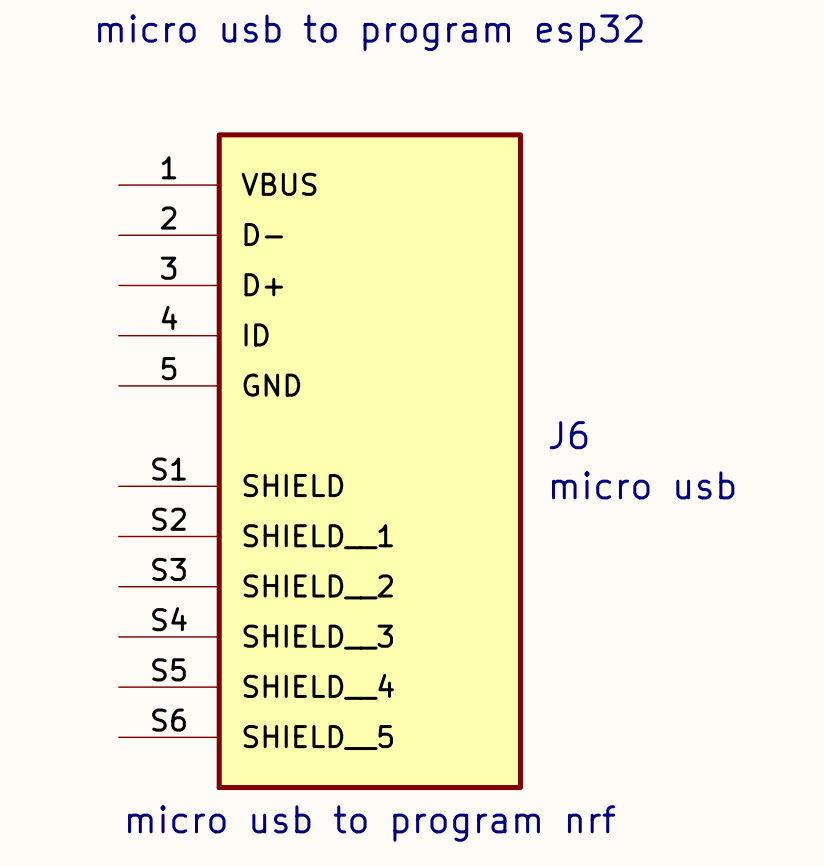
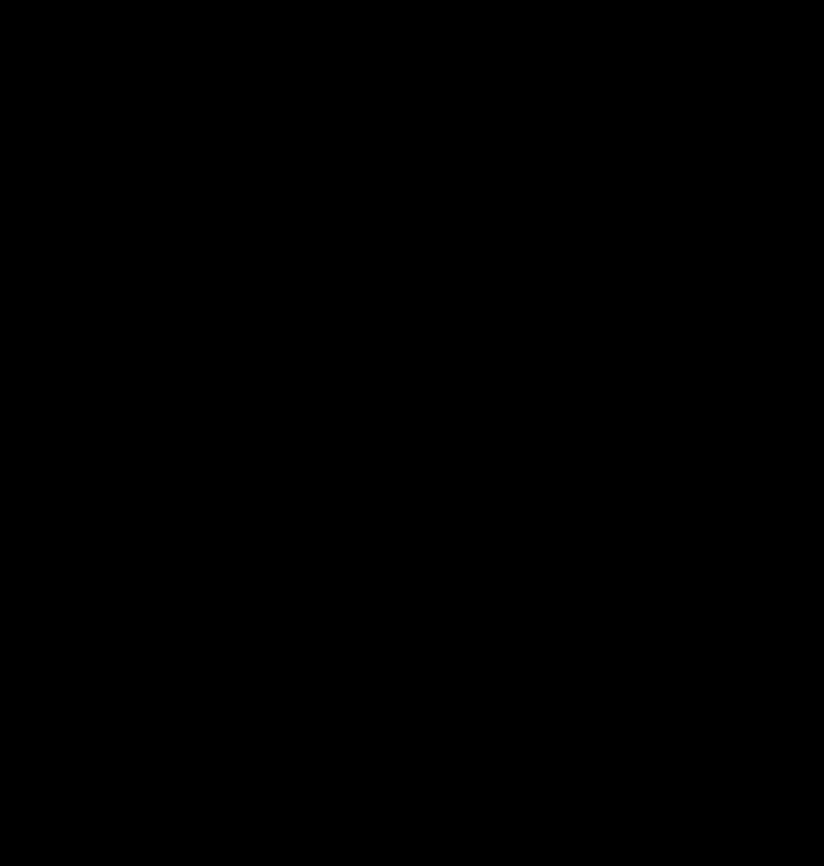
text: micro usb to program esp32 (370, 32) -> none
J6: micro usb (320, 461) -> none
text: micro usb to program nrf (371, 823) -> none

